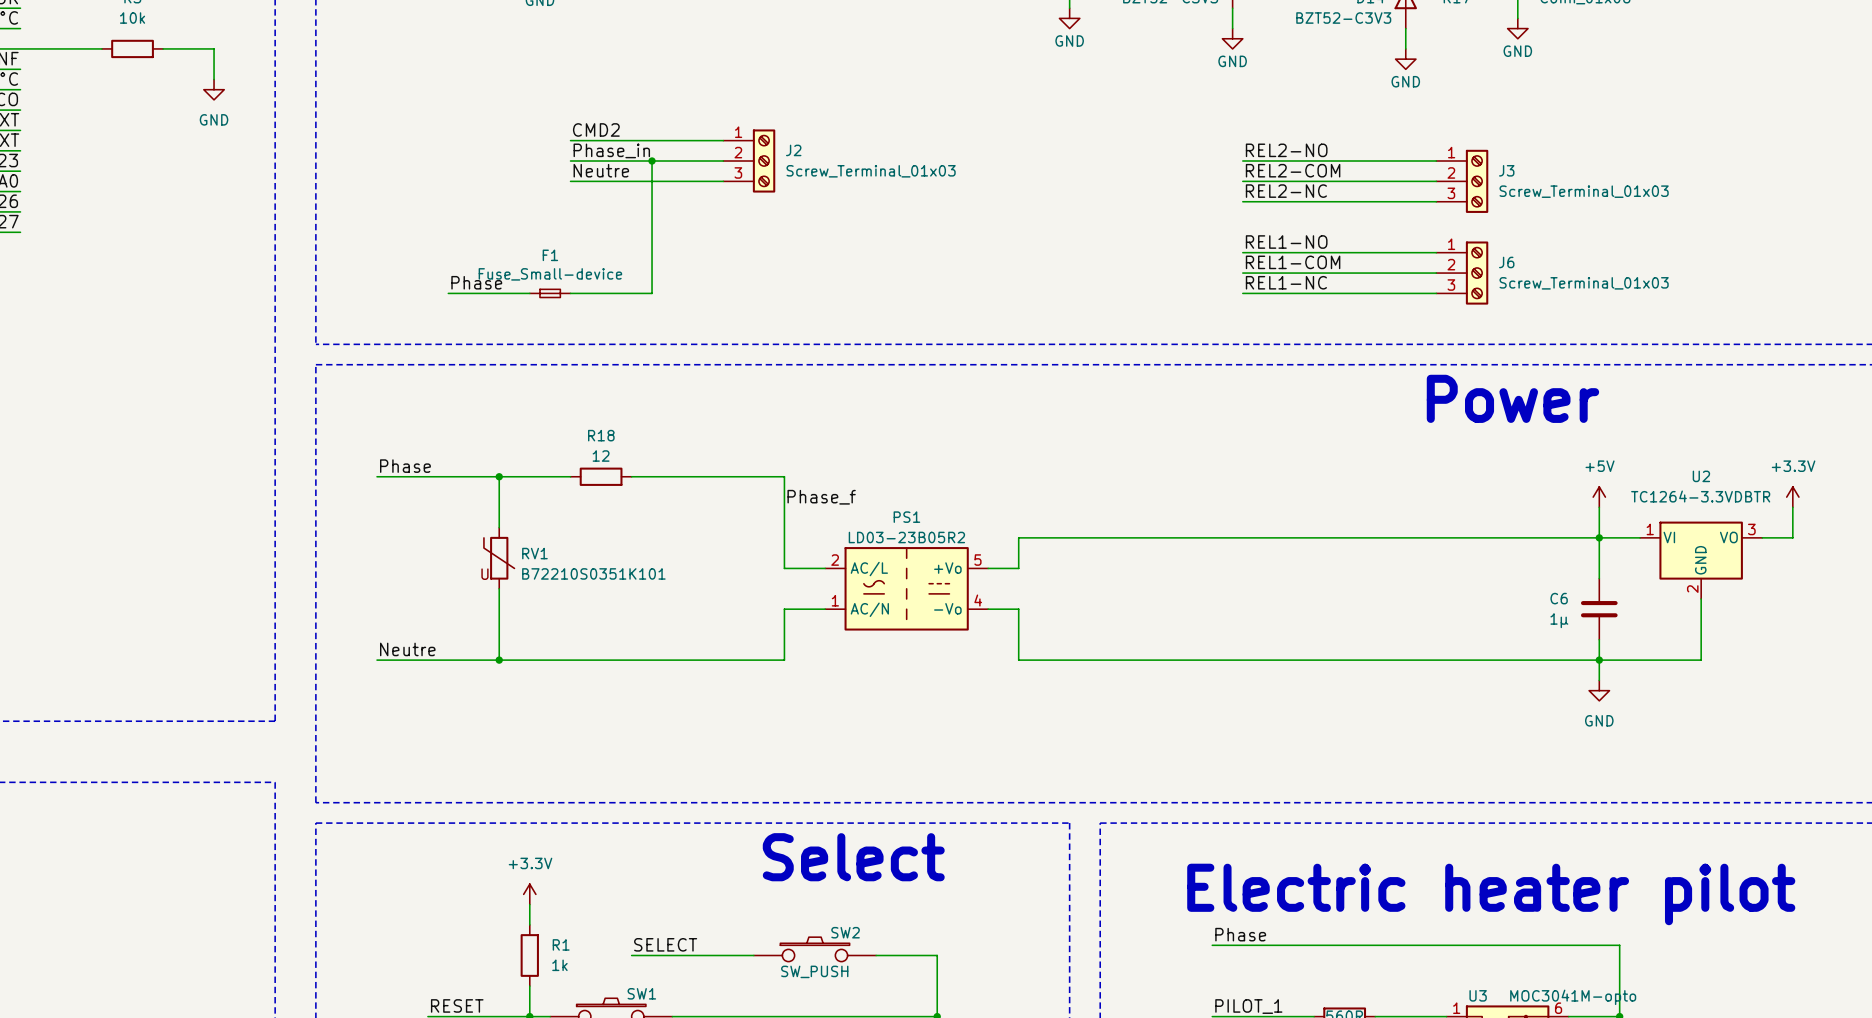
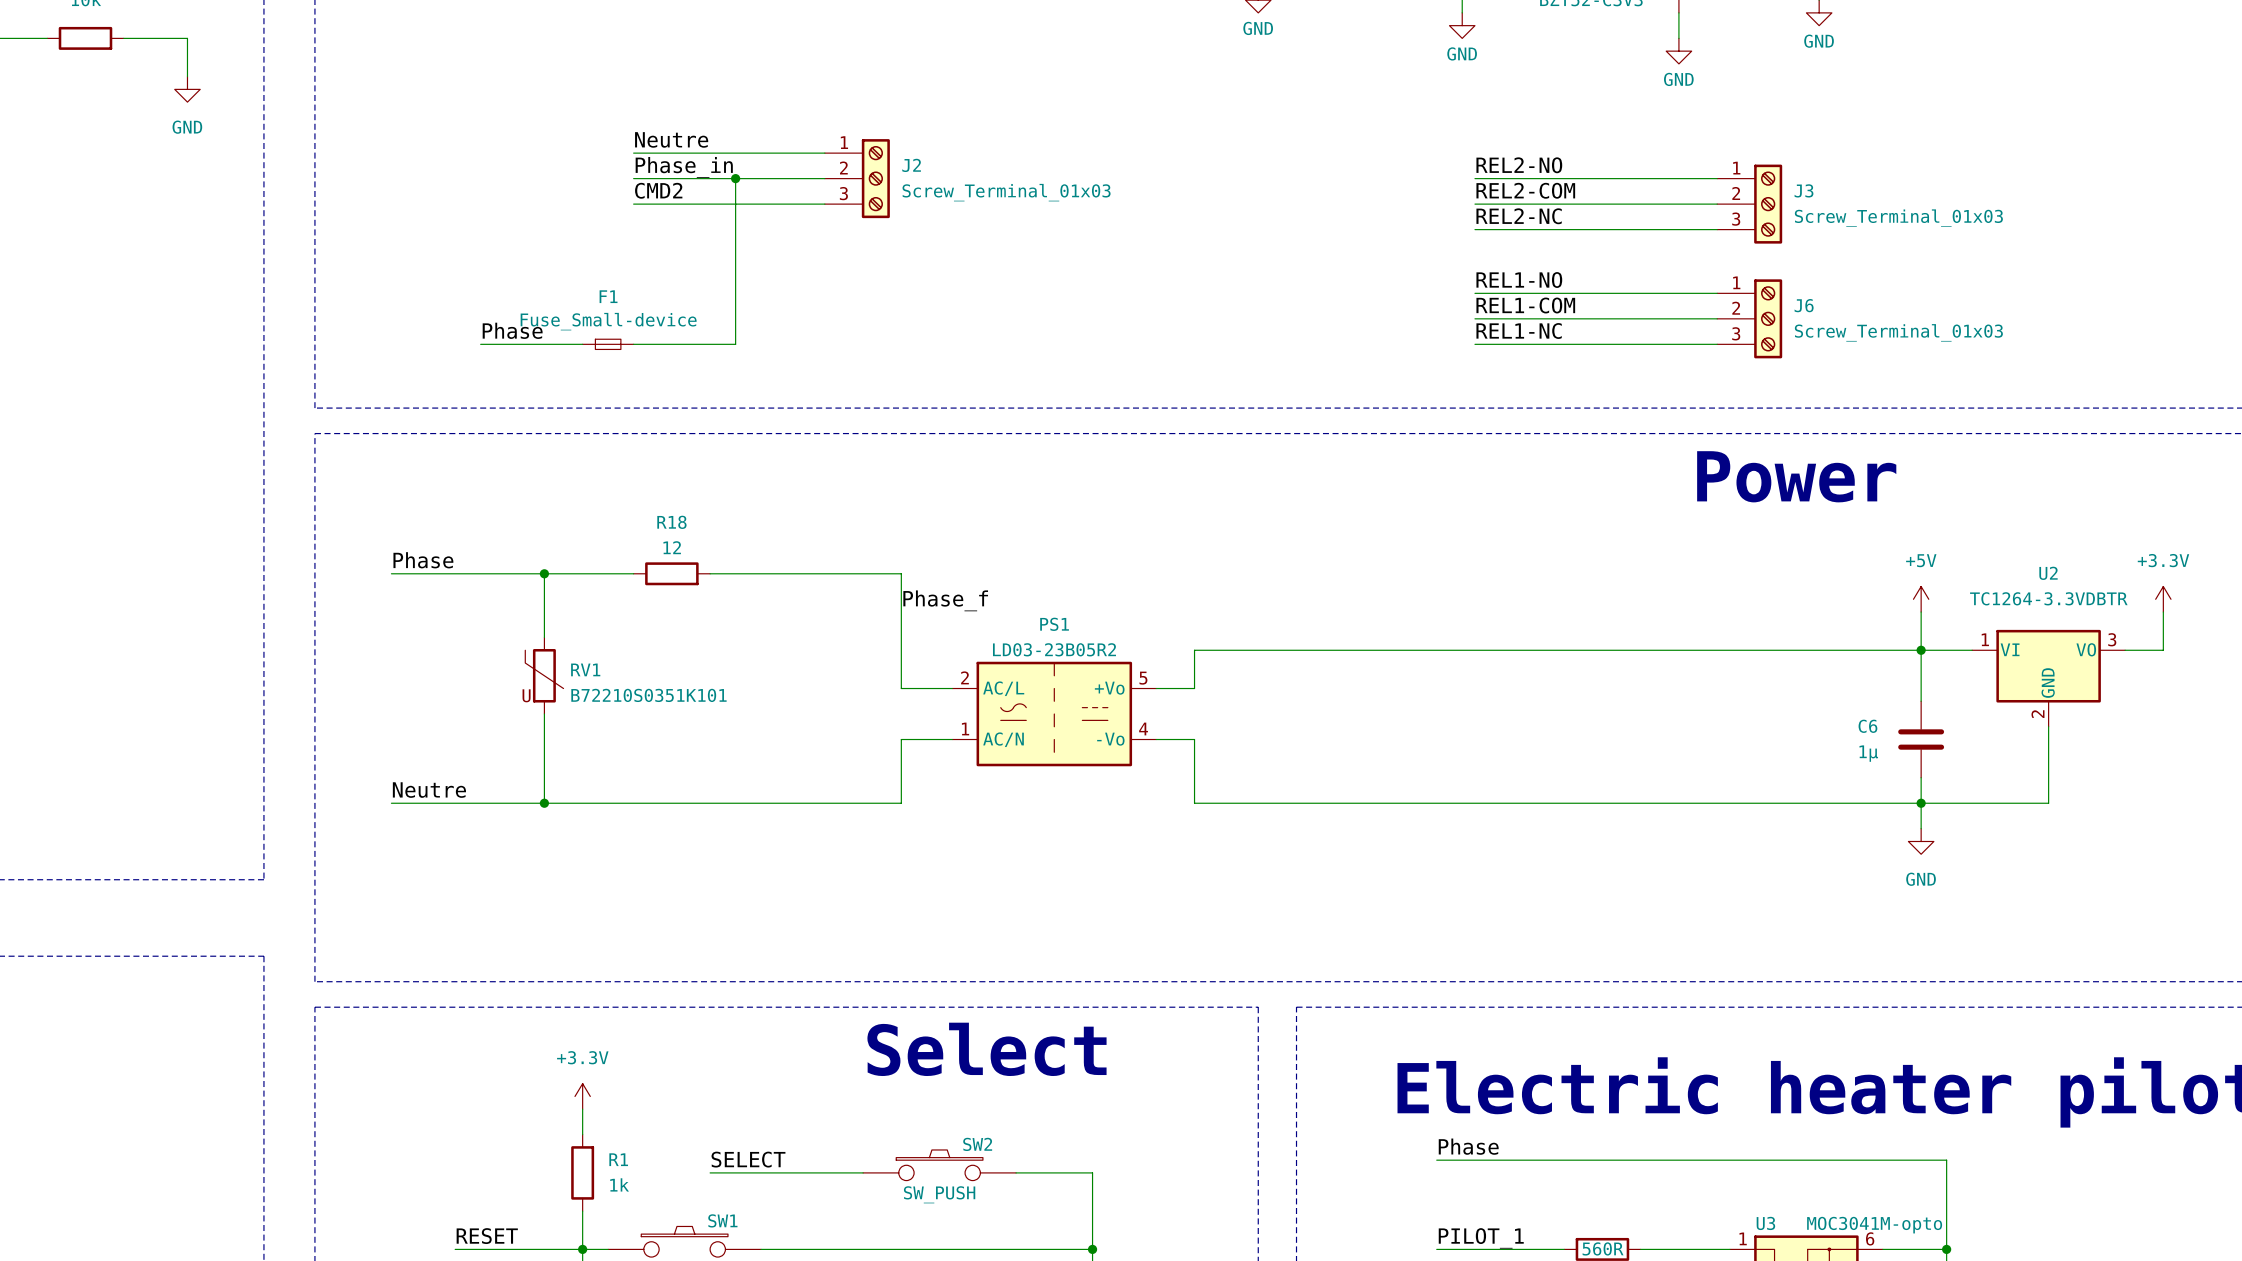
label: CMD2 (596, 129) -> Neutre (671, 139)
label: Neutre (601, 170) -> CMD2 (658, 190)

